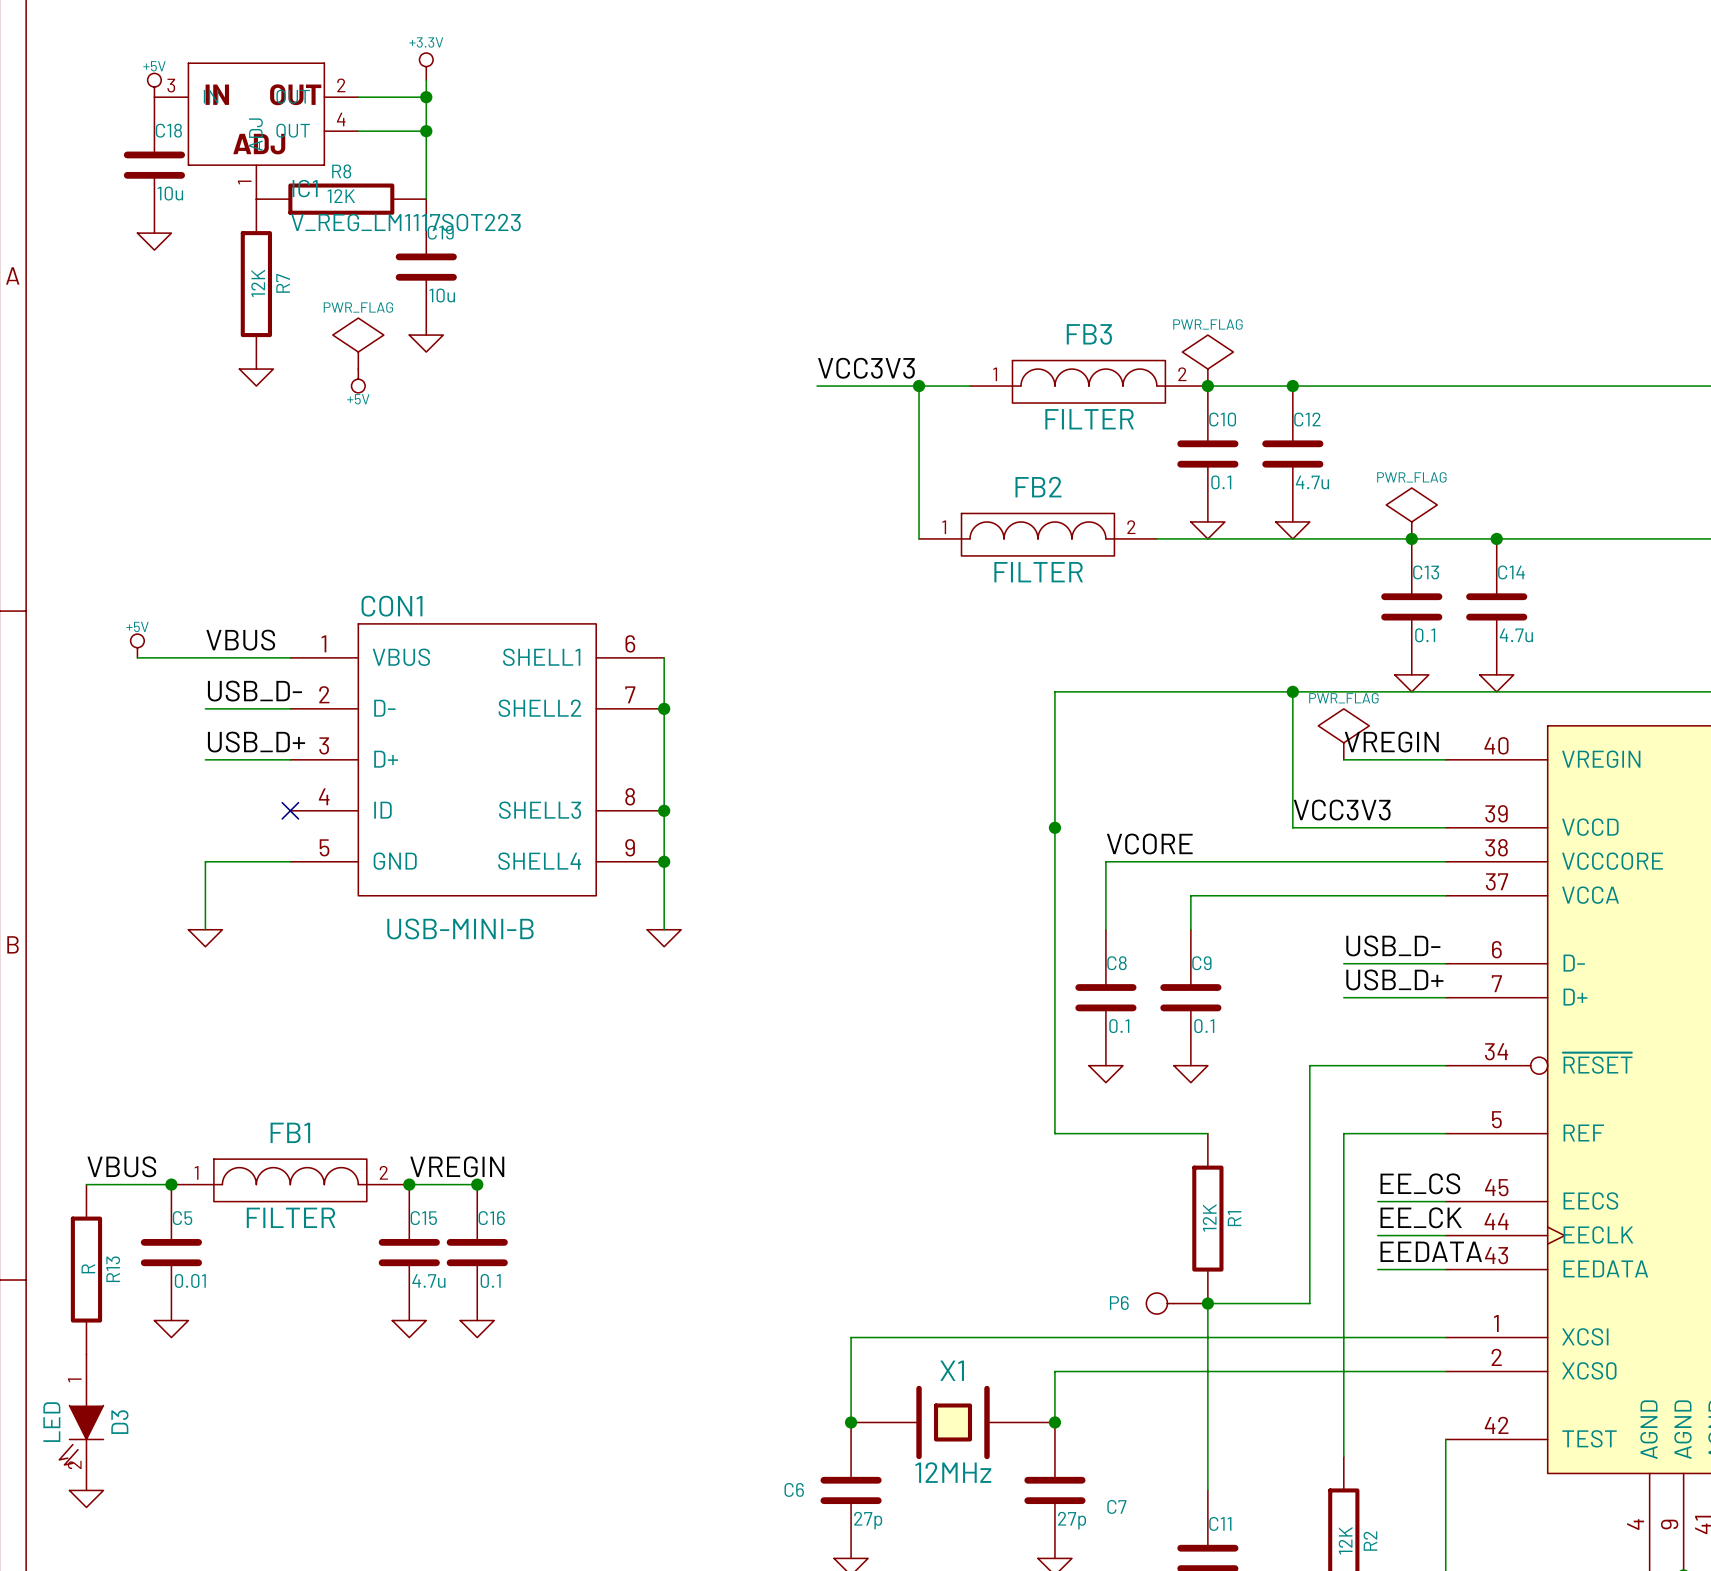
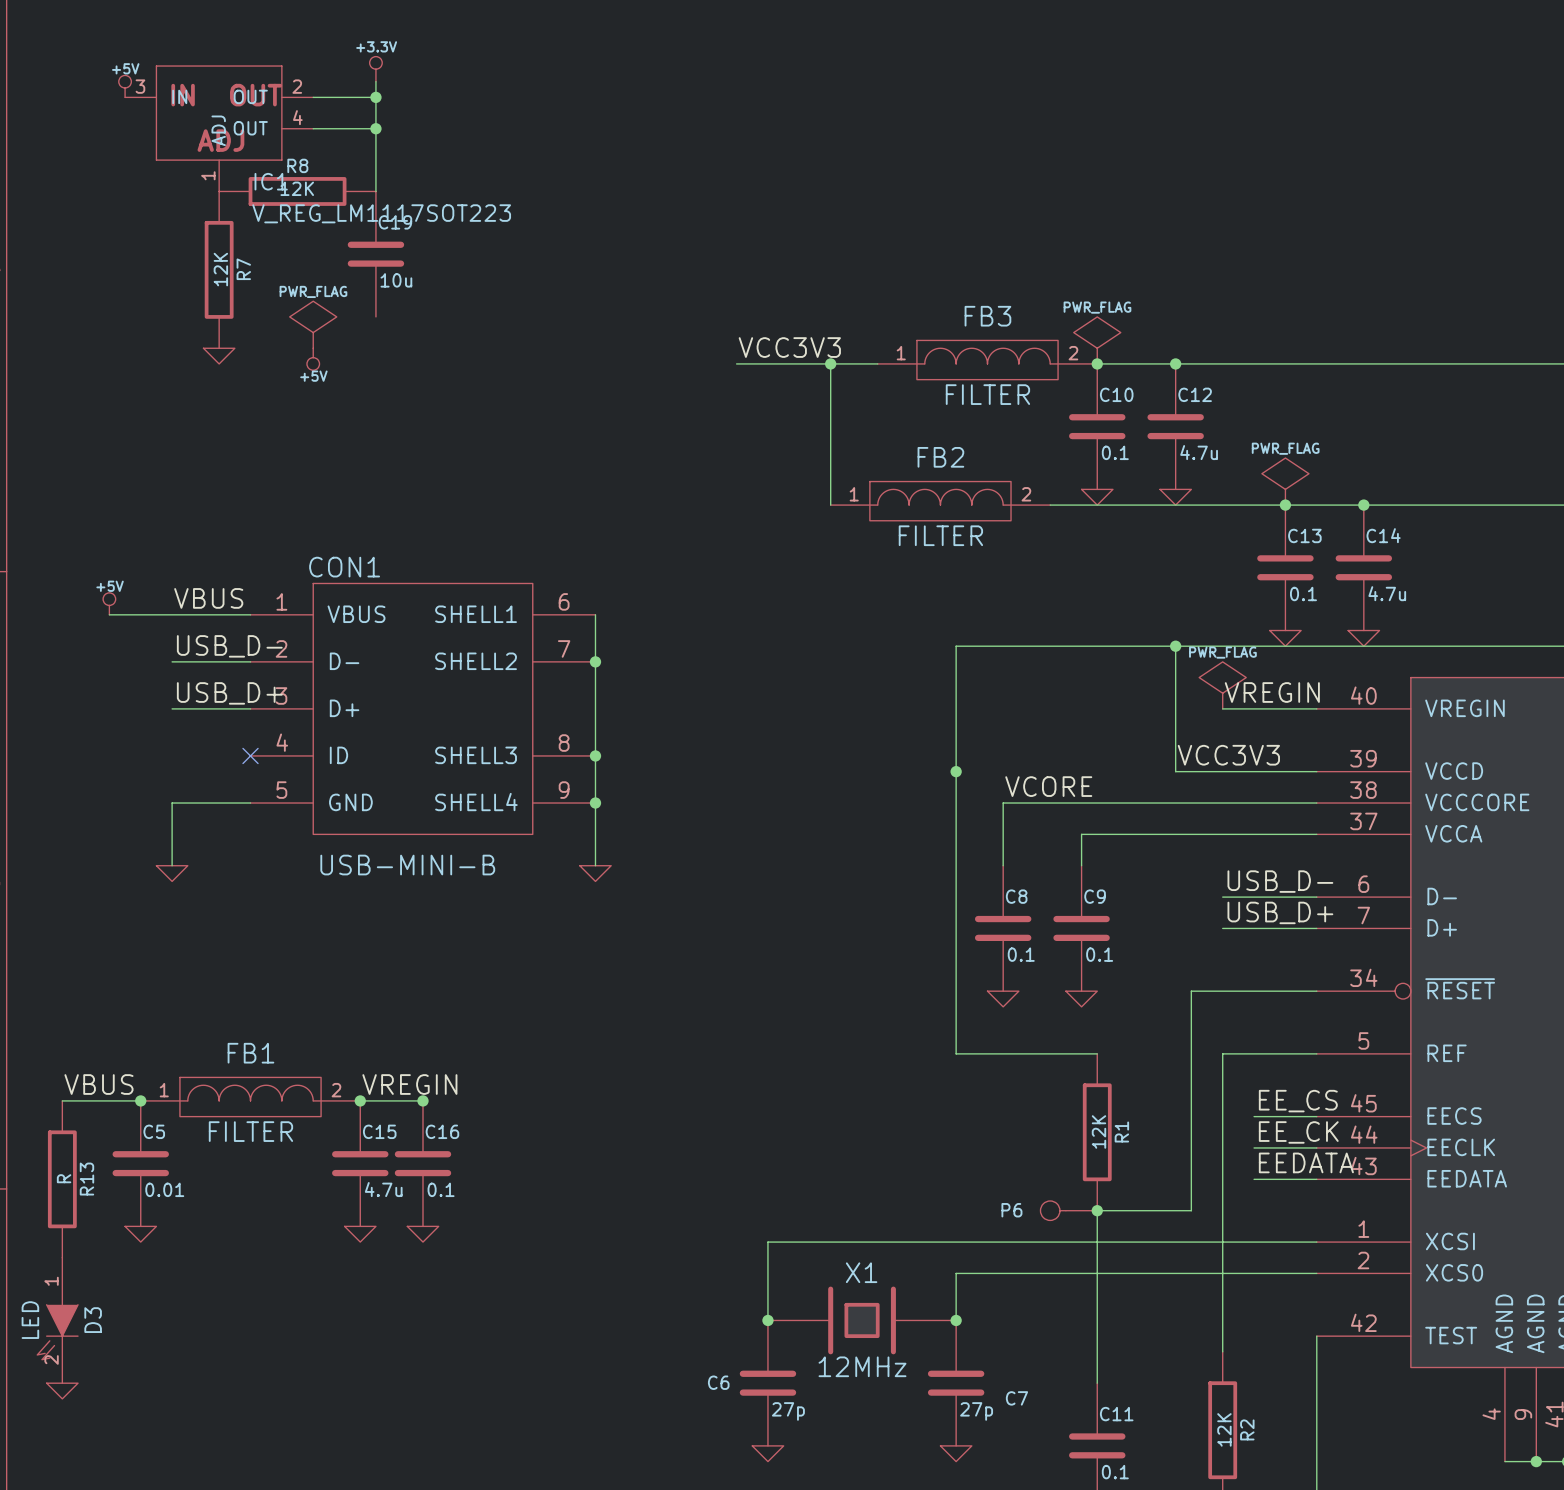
C18: 10u (154, 165) -> none
power symbol: (154, 241) -> none
power symbol: (426, 343) -> none

